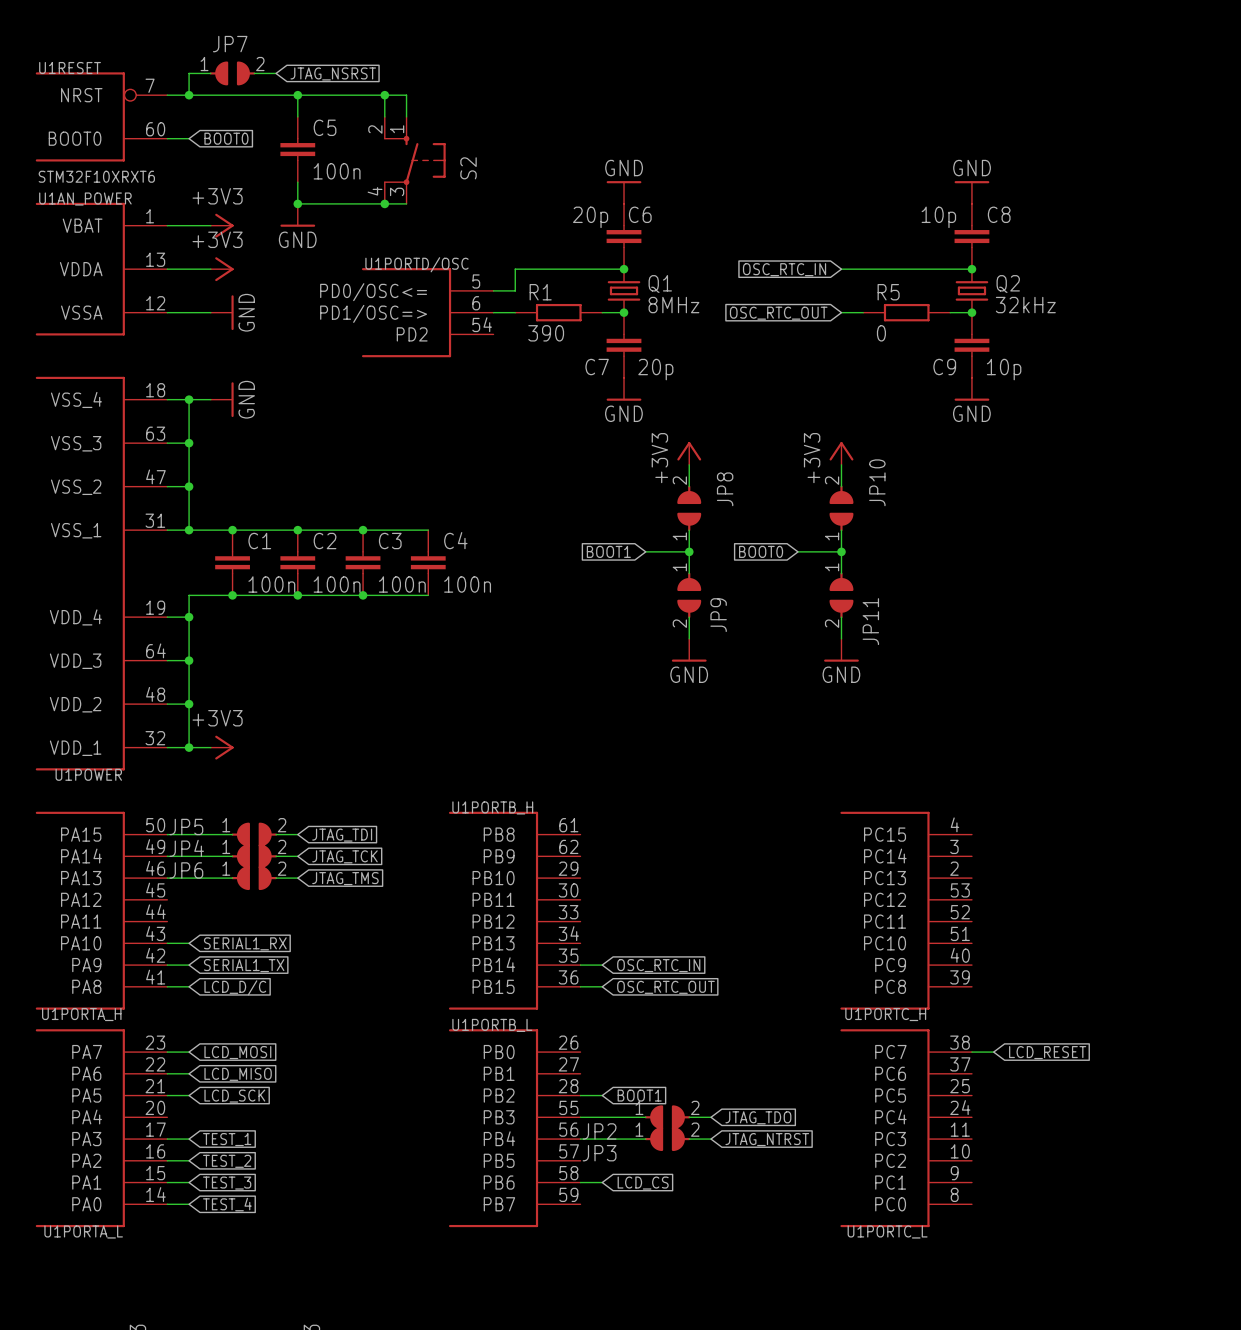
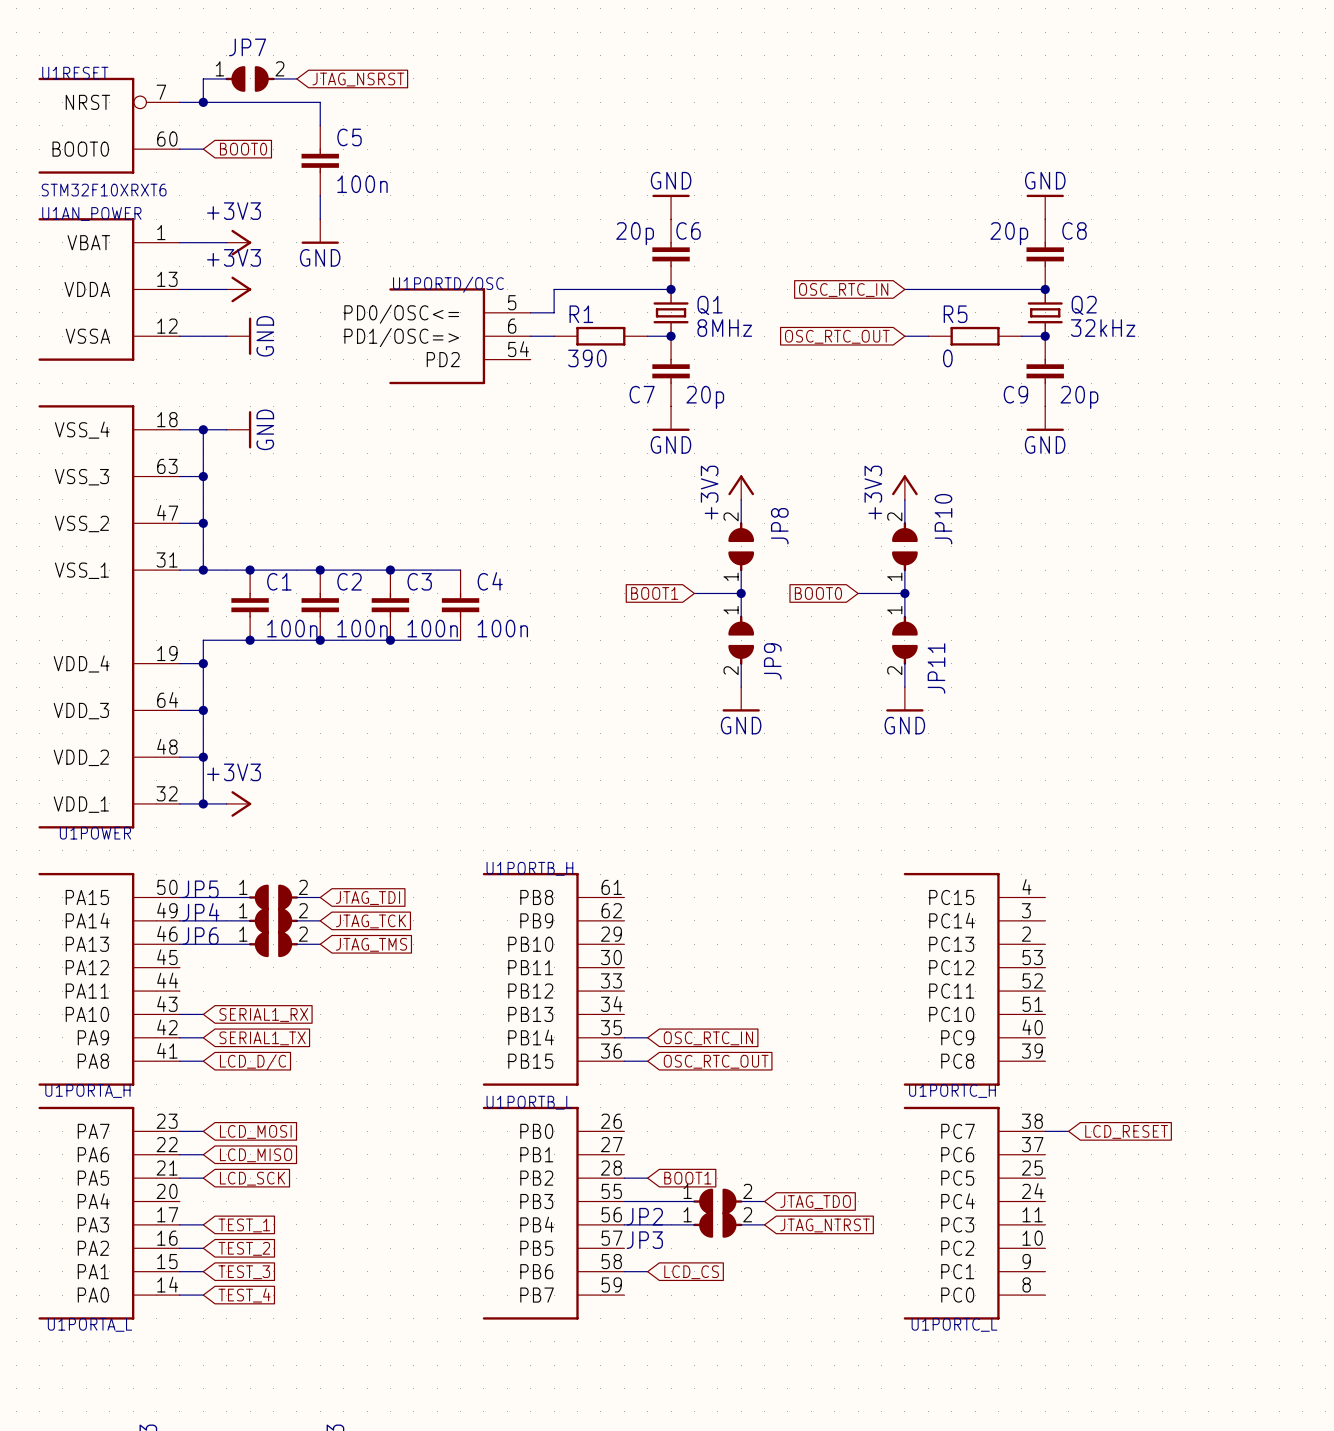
wire: (297, 95) (406, 95) (406, 116) -> none
junction: (297, 95) -> none
wire: (384, 95) (384, 116) -> none
junction: (384, 95) -> none
S2: (414, 160) -> none
wire: (297, 203) (406, 203) -> none
junction: (297, 203) -> none
junction: (384, 203) -> none
C8 value: 10p (938, 217) -> 20p (1009, 233)
C9 value: 10p (1004, 369) -> 20p (1079, 397)

